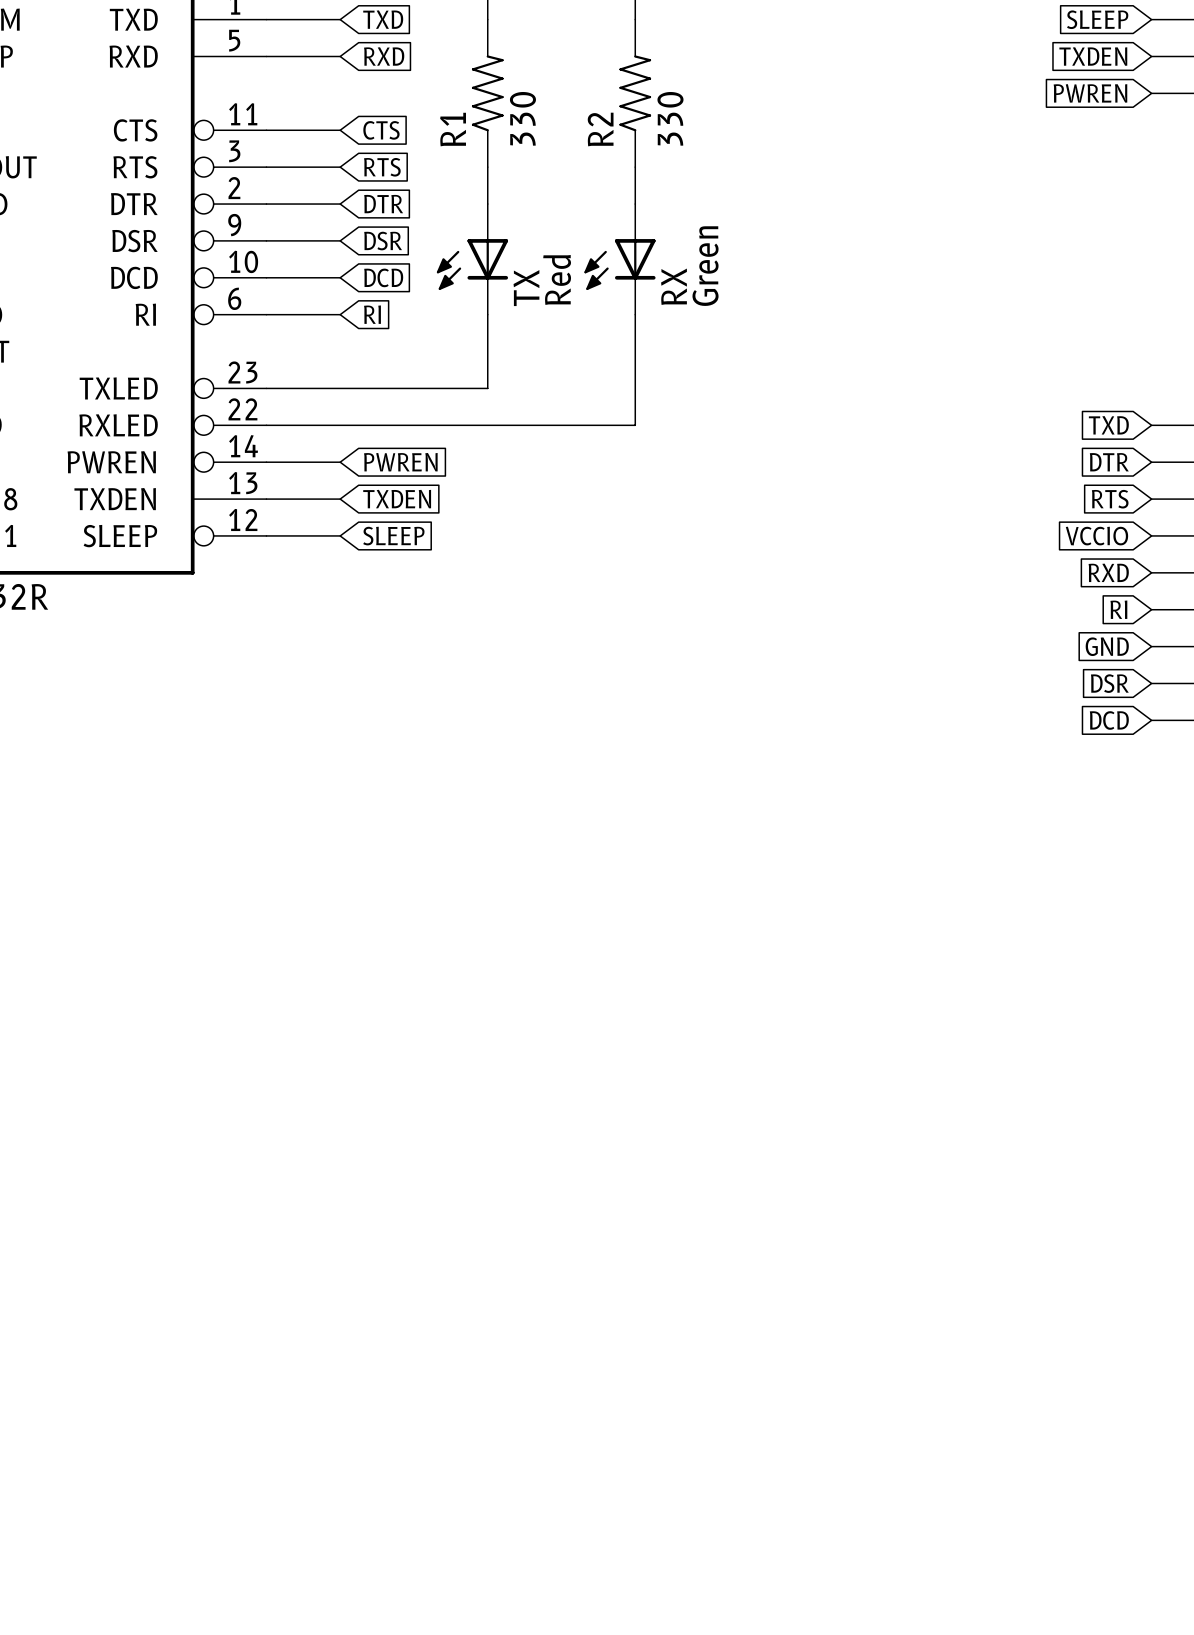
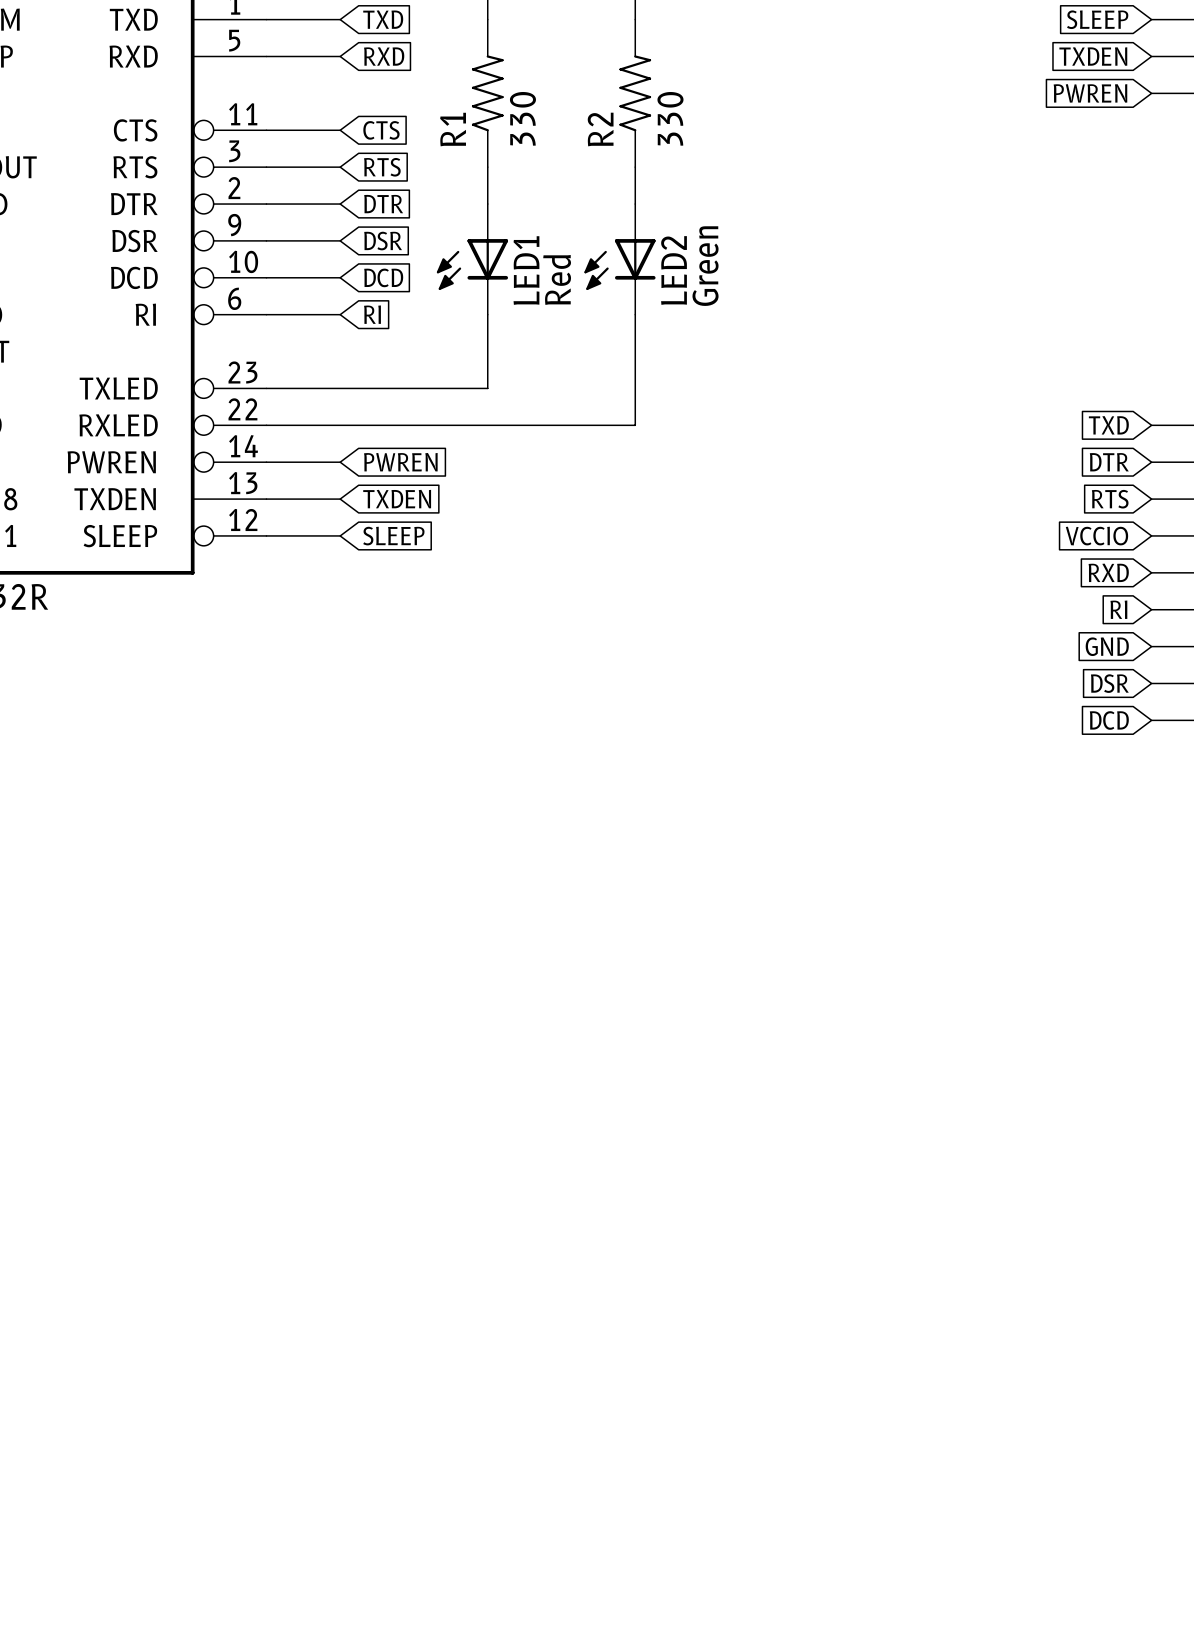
RX name: RX (674, 286) -> LED2 (674, 270)
TX name: TX (526, 288) -> LED1 (526, 270)

